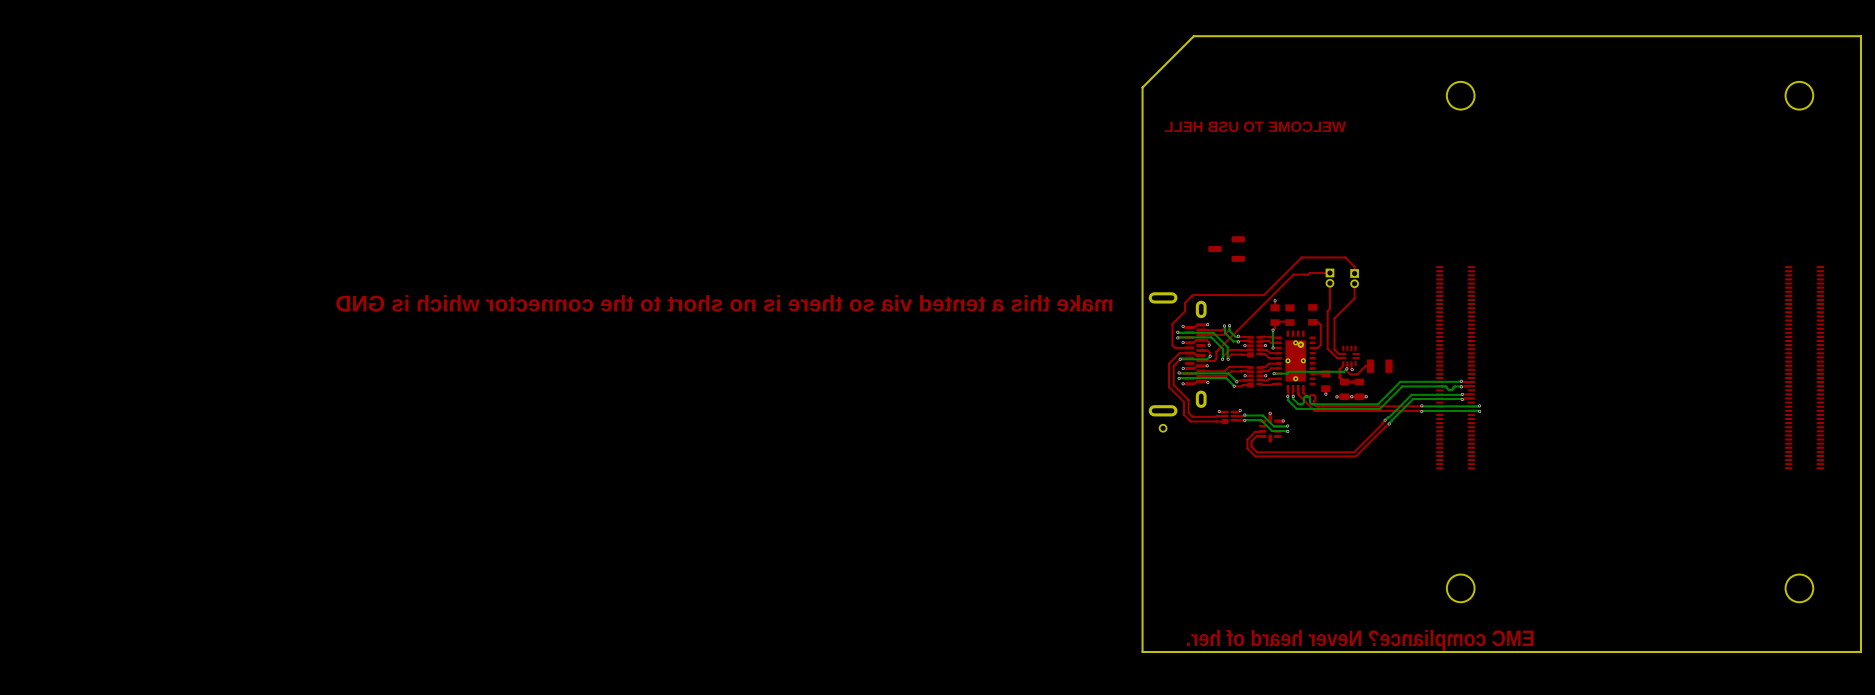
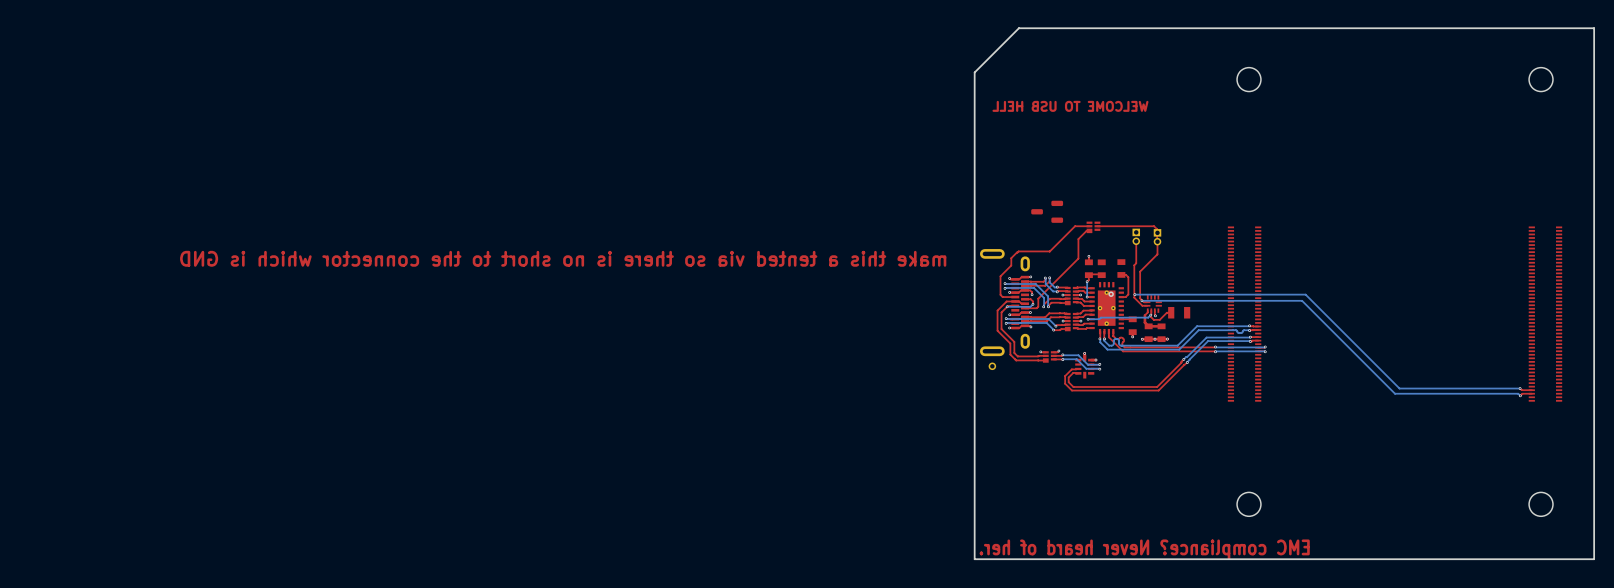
top track: none -> (1097, 226) (1154, 226) (1157, 229) (1157, 237)
part: none -> (1093, 227)
top track: (1329, 272) (1293, 274) (1216, 351) -> (1089, 230) (1086, 230) (1078, 239) (1078, 258) (1038, 300)
top track: (1354, 273) (1354, 266) (1345, 257) (1301, 257) (1264, 295) (1229, 295) -> (1089, 226) (1075, 226) (1049, 251)
bottom track: none -> (1134, 294) (1305, 294) (1399, 388) (1520, 388)
via: none -> (1134, 294)
bottom track: none -> (1141, 300) (1302, 300) (1395, 393) (1518, 393) (1520, 395)
via: none -> (1141, 300)
top track: none -> (1520, 388) (1531, 390)
via: none -> (1520, 388)
top track: none -> (1531, 393) (1522, 393) (1520, 395)
via: none -> (1520, 395)

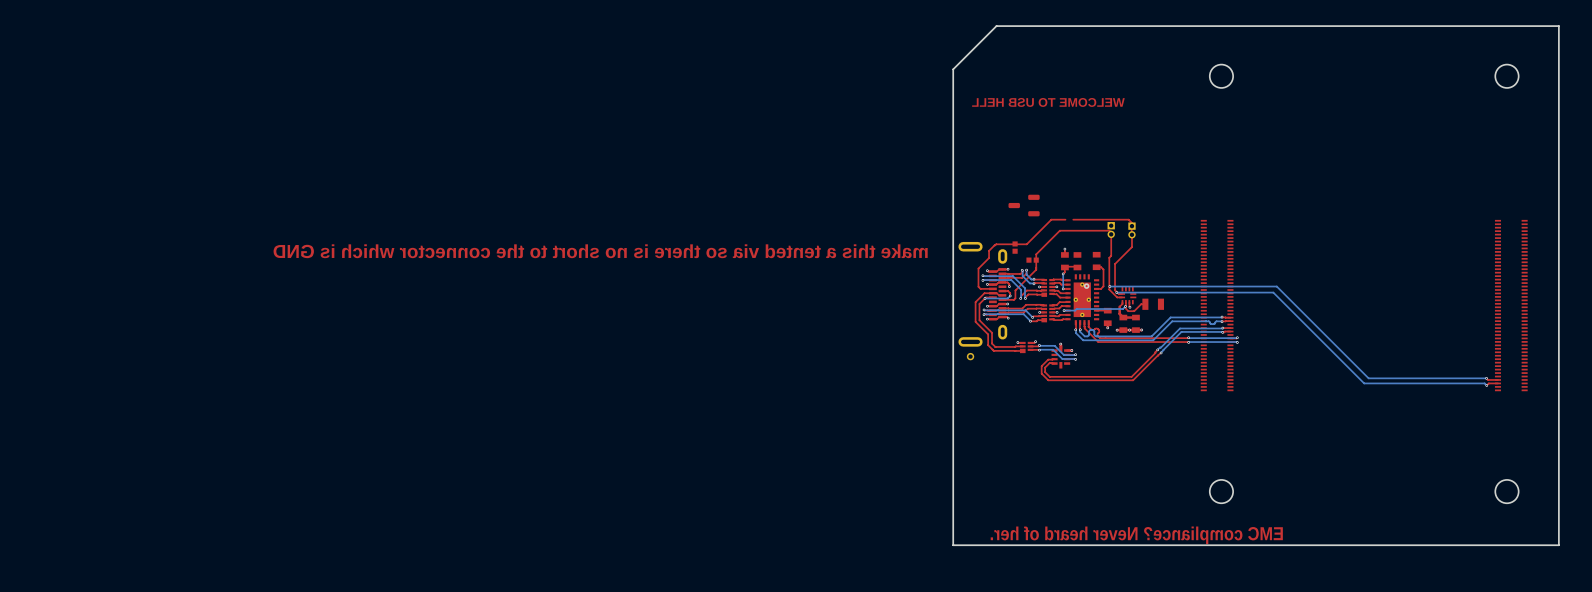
part: (1093, 227) -> none
top track: (1089, 230) (1086, 230) (1078, 239) (1078, 258) (1059, 277) -> (1036, 267) (1036, 269)
top track: none -> (1109, 230) (1059, 230) (1036, 254) (1036, 267)
part: none -> (1015, 247)
part: none -> (1032, 260)

